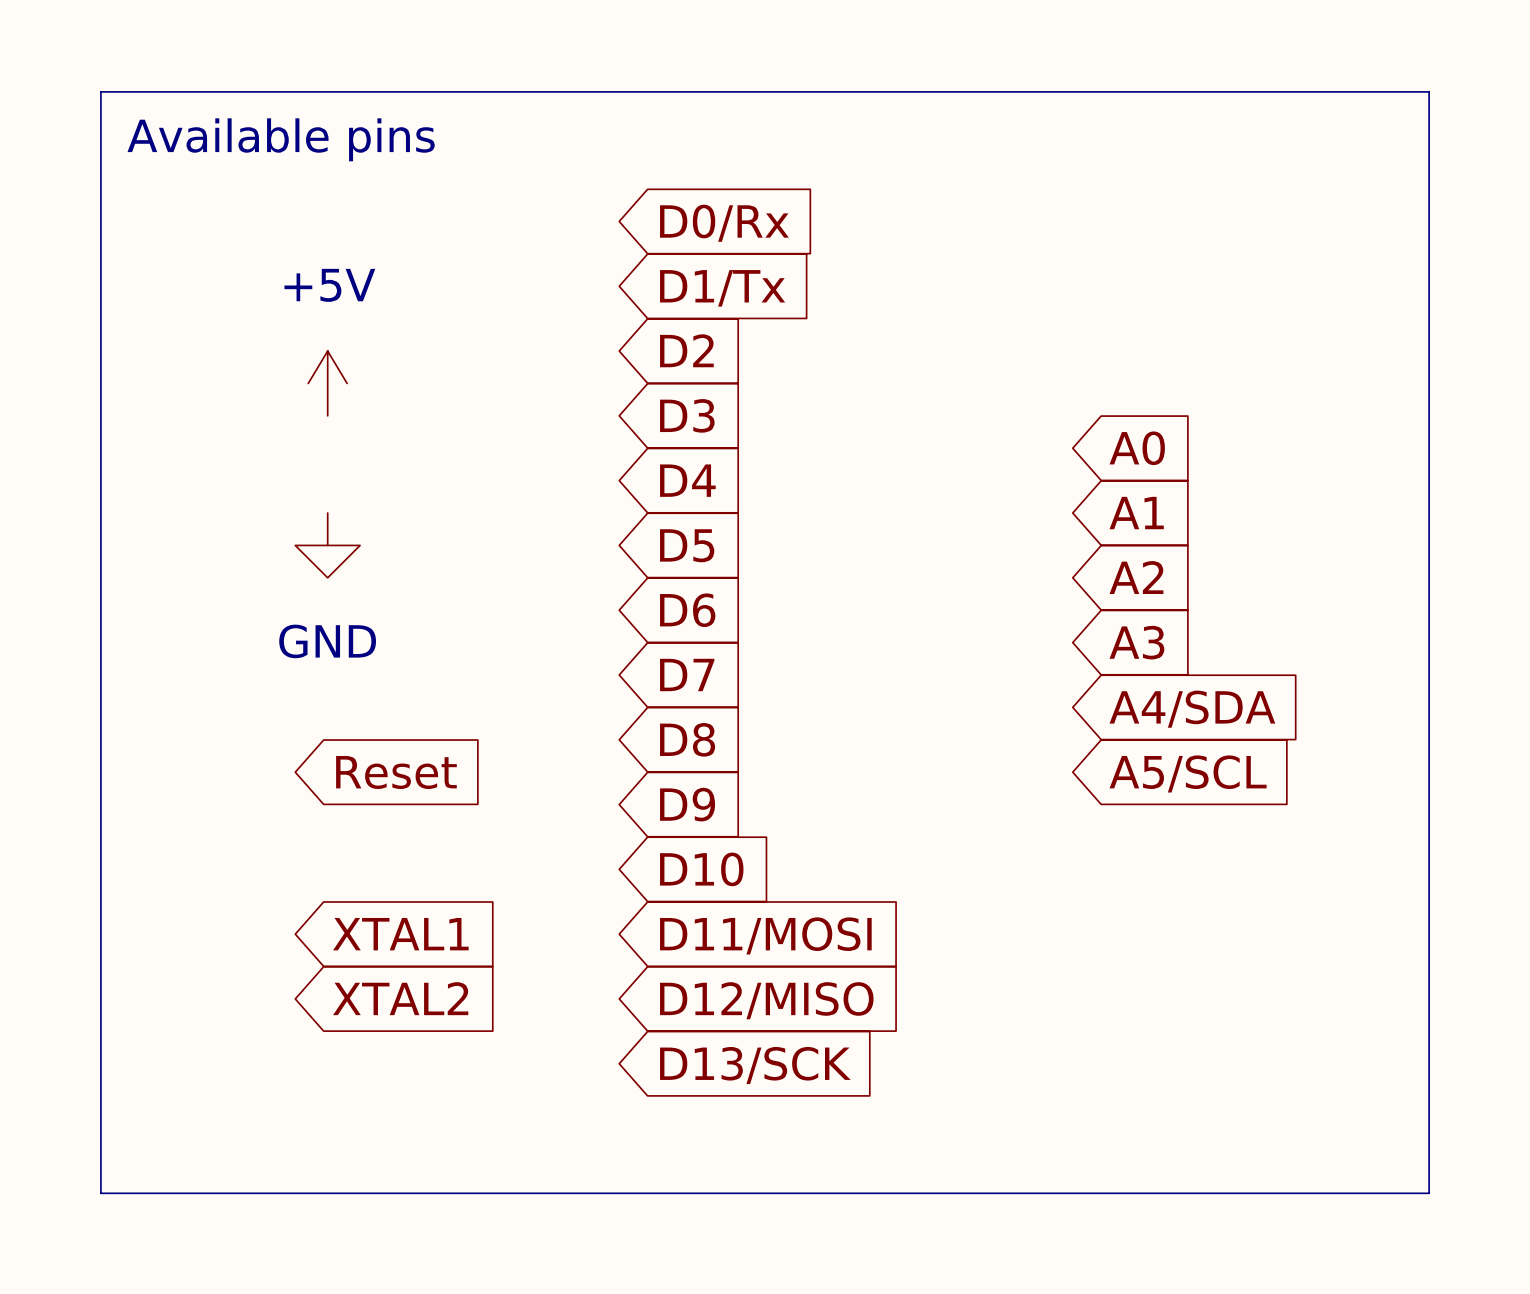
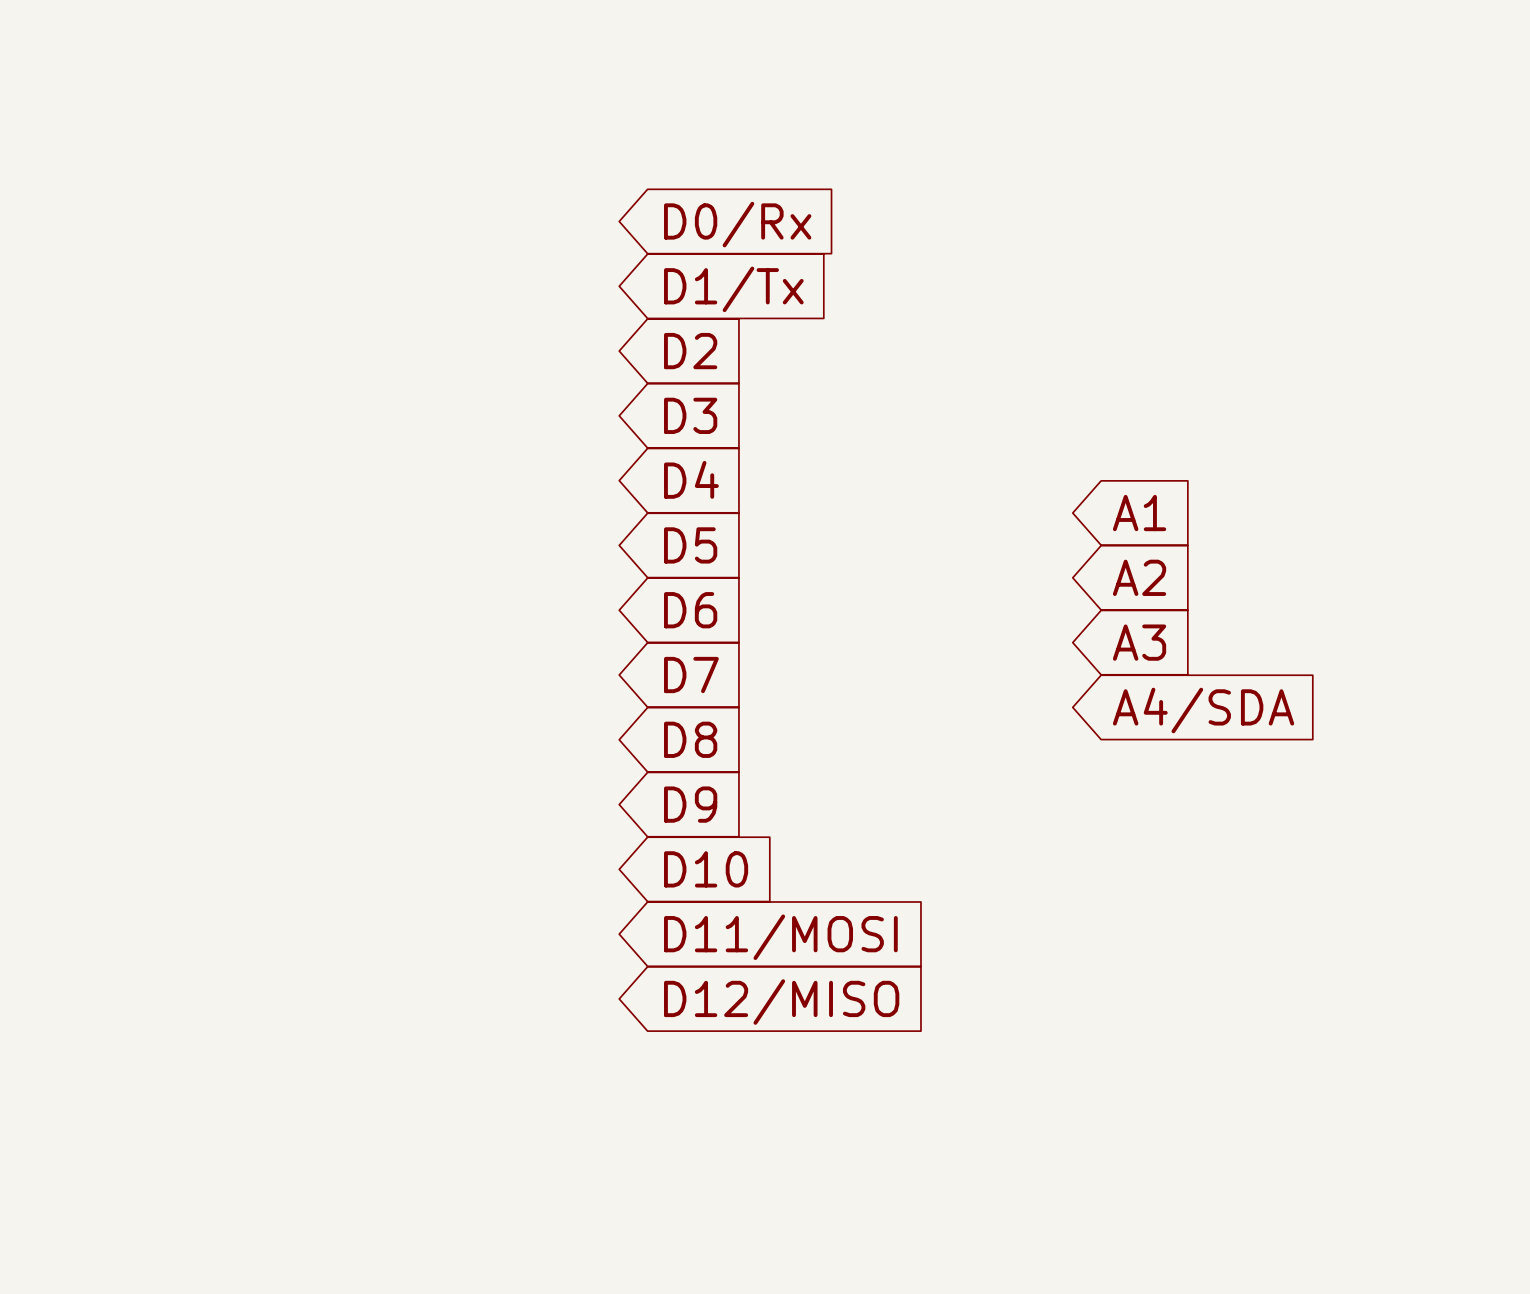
line: (100, 91) (1429, 91) (1429, 1193) (100, 1193) (100, 91) -> none
text: Available pins (281, 139) -> none
power symbol: +5V (327, 383) -> none
global label: A0 (1137, 448) -> none
power symbol: GND (327, 545) -> none
global label: Reset (396, 772) -> none
global label: A5/SCL (1188, 773) -> none
global label: XTAL1 (400, 934) -> none
global label: XTAL2 (400, 998) -> none
global label: D13/SCK (755, 1065) -> none

